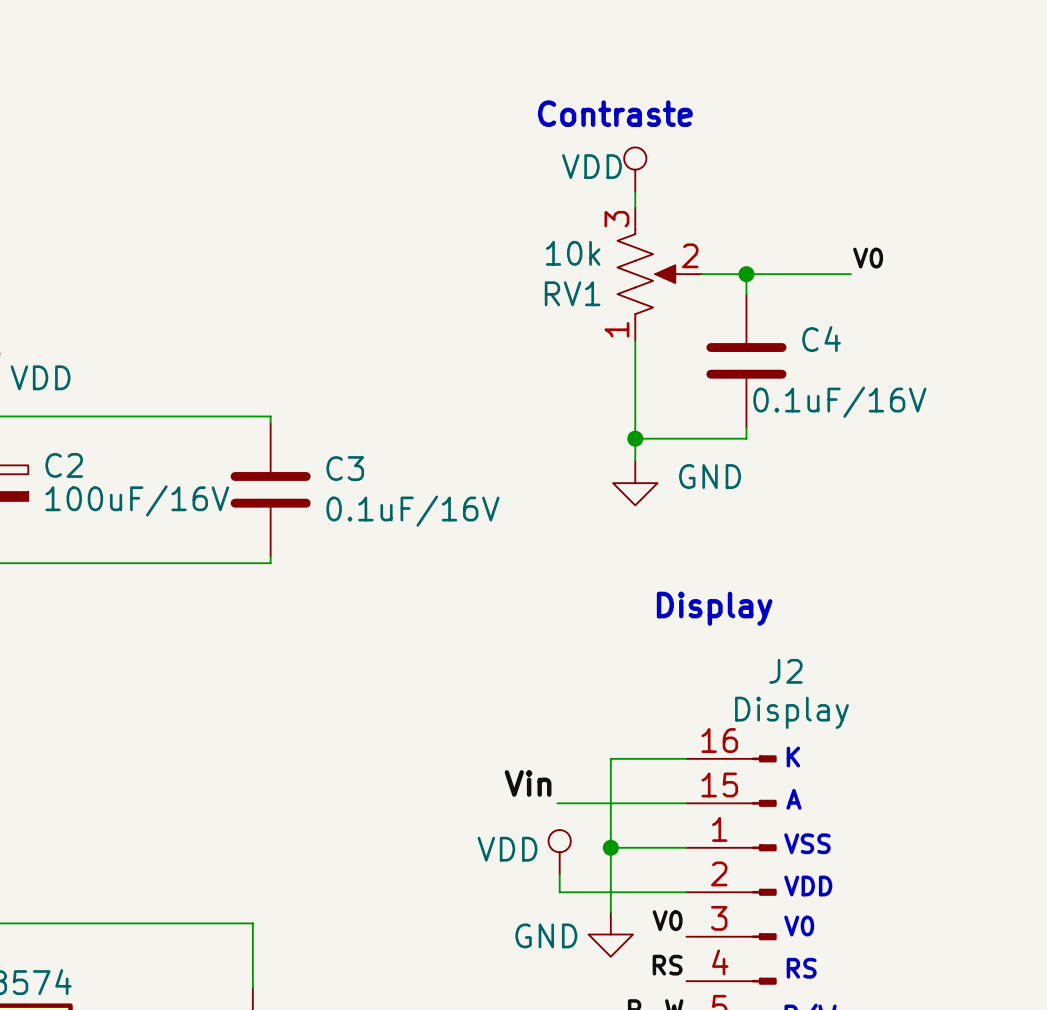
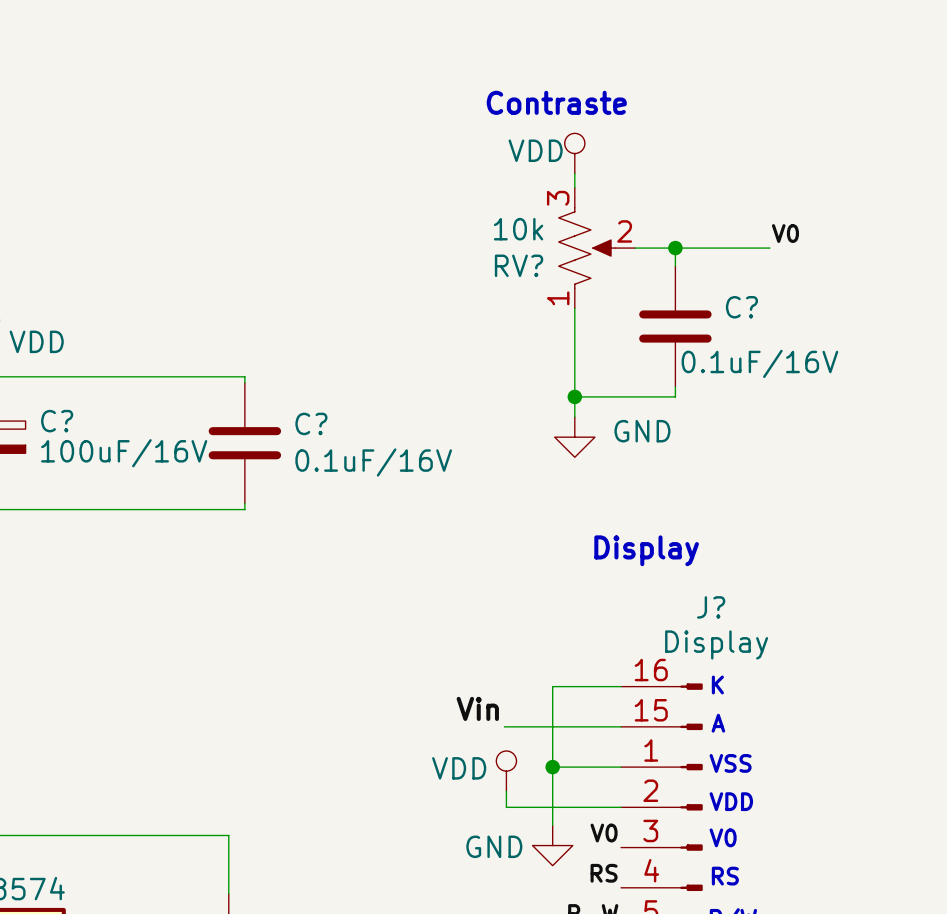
RV1 name: RV1 (572, 293) -> RV? (519, 265)
C4 name: C4 (821, 339) -> C? (741, 307)
C2 name: C2 (64, 465) -> C? (57, 421)
C3 name: C3 (345, 468) -> C? (311, 423)
J2 name: J2 (785, 671) -> J? (711, 607)

